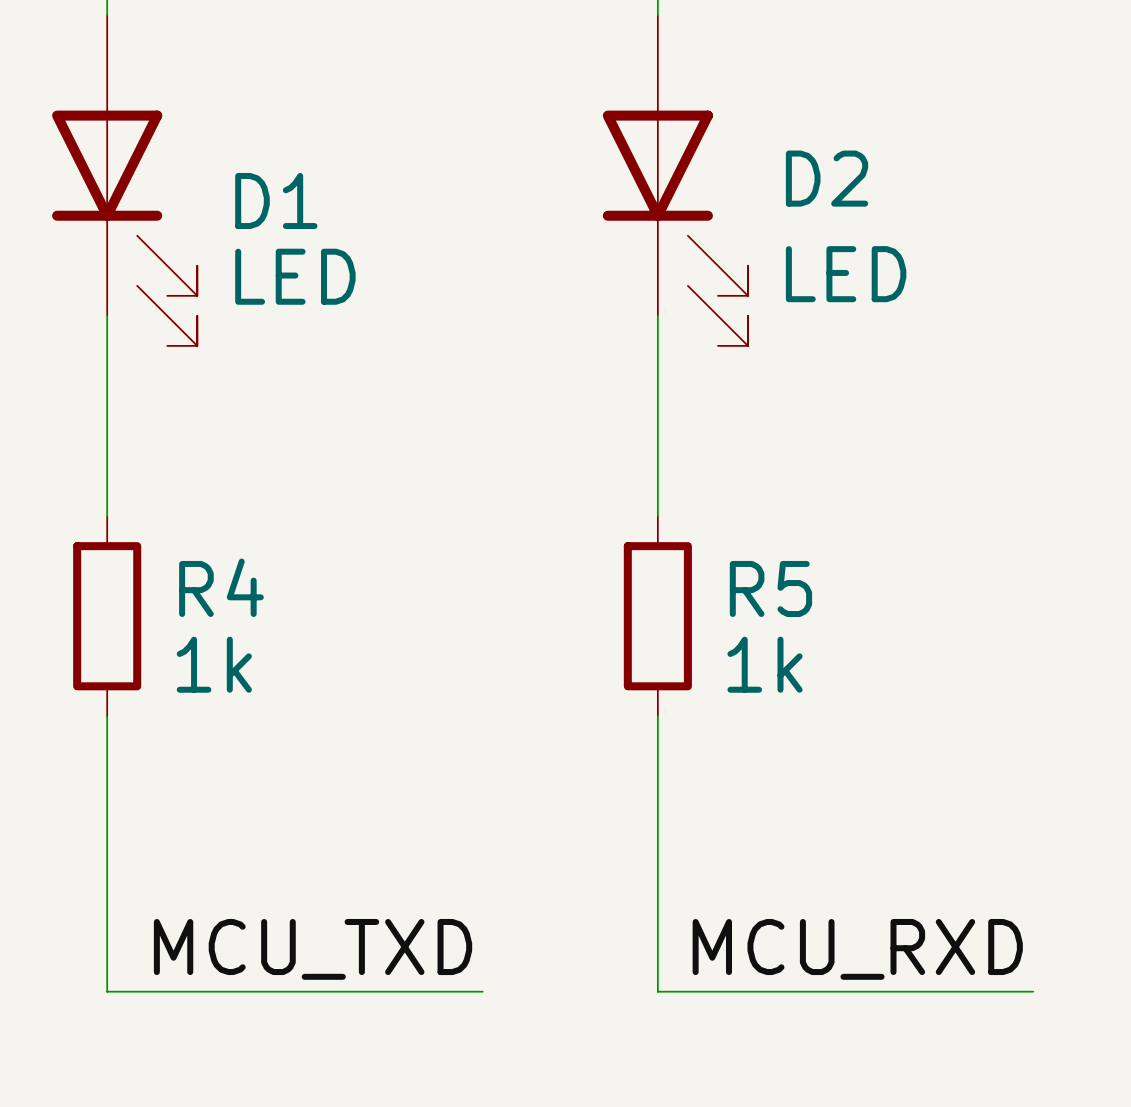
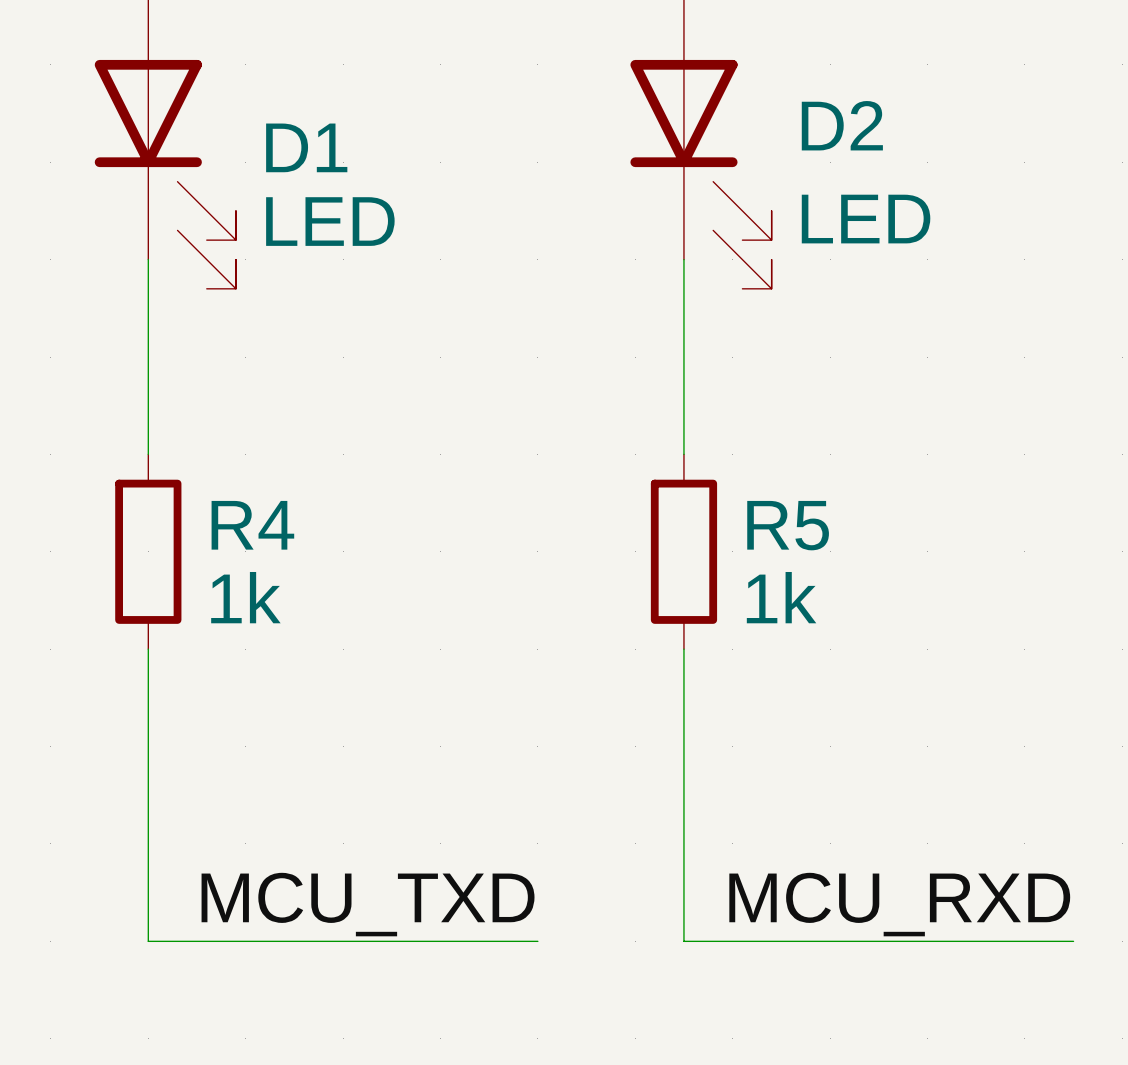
label position: MCU_TXD (313, 949) -> MCU_TXD (368, 904)
label position: MCU_RXD (857, 949) -> MCU_RXD (899, 904)
wire: (107, 991) (482, 991) -> (148, 917) (148, 941) (537, 941)
wire: (657, 991) (1033, 991) -> (683, 917) (683, 941) (1073, 941)

